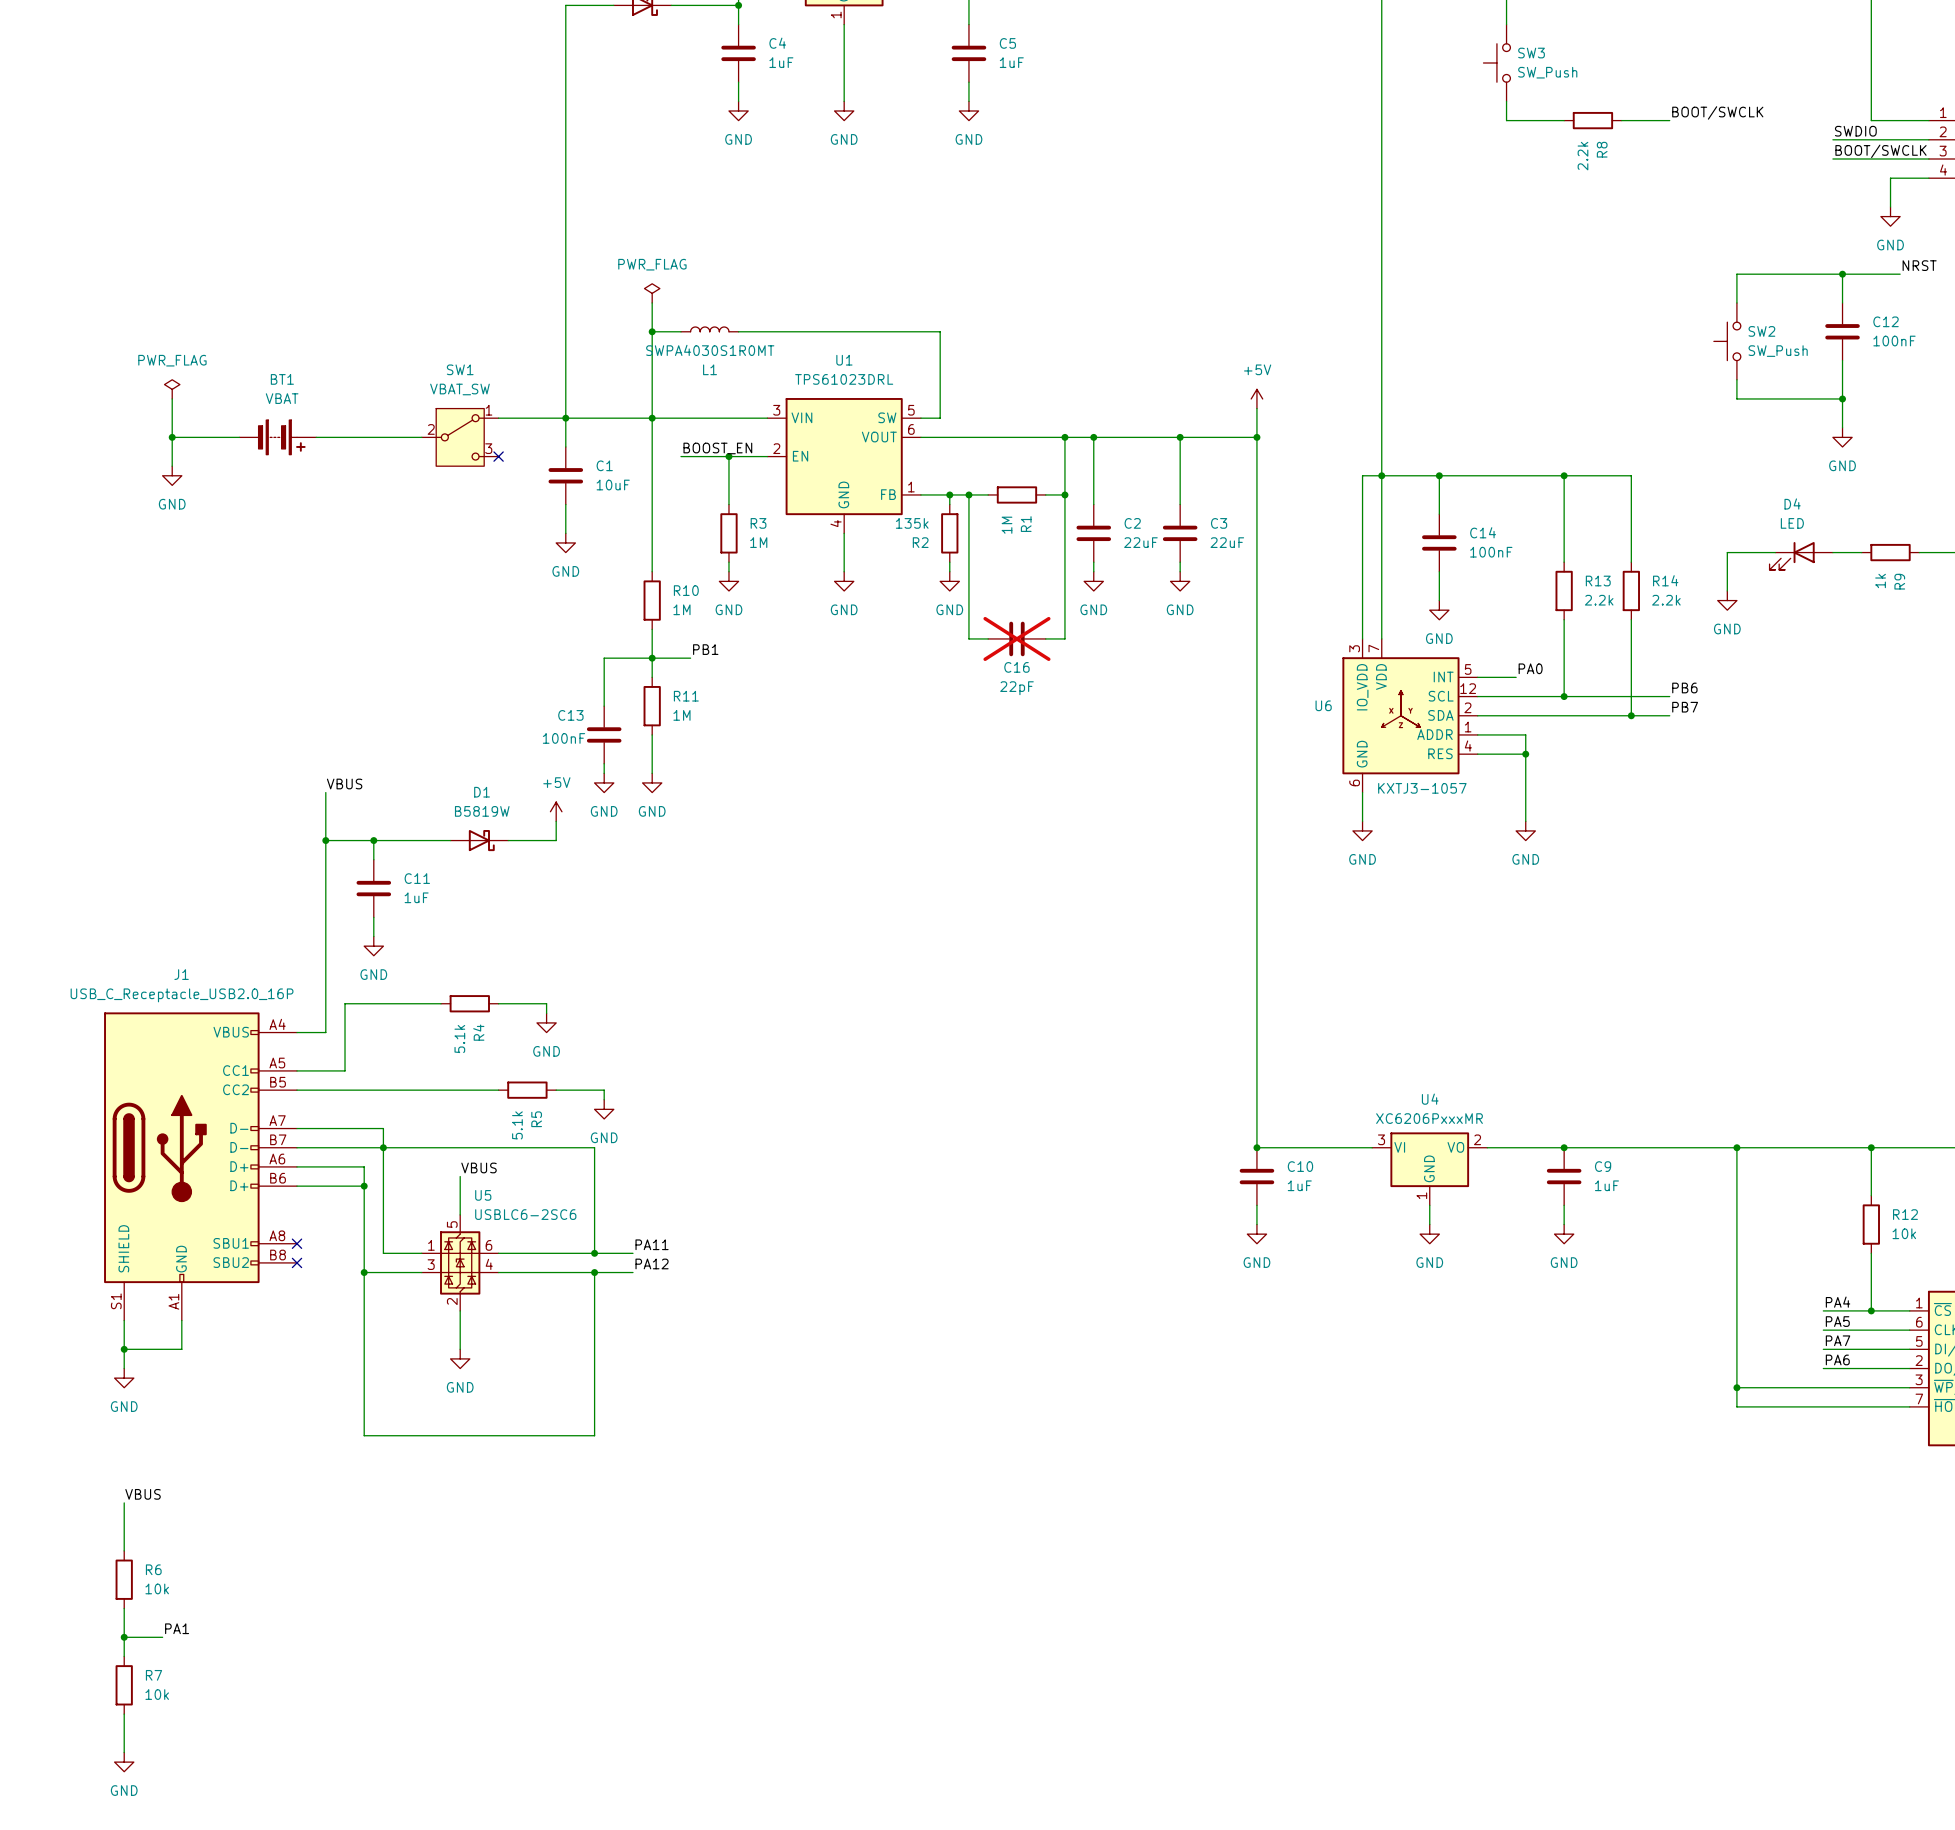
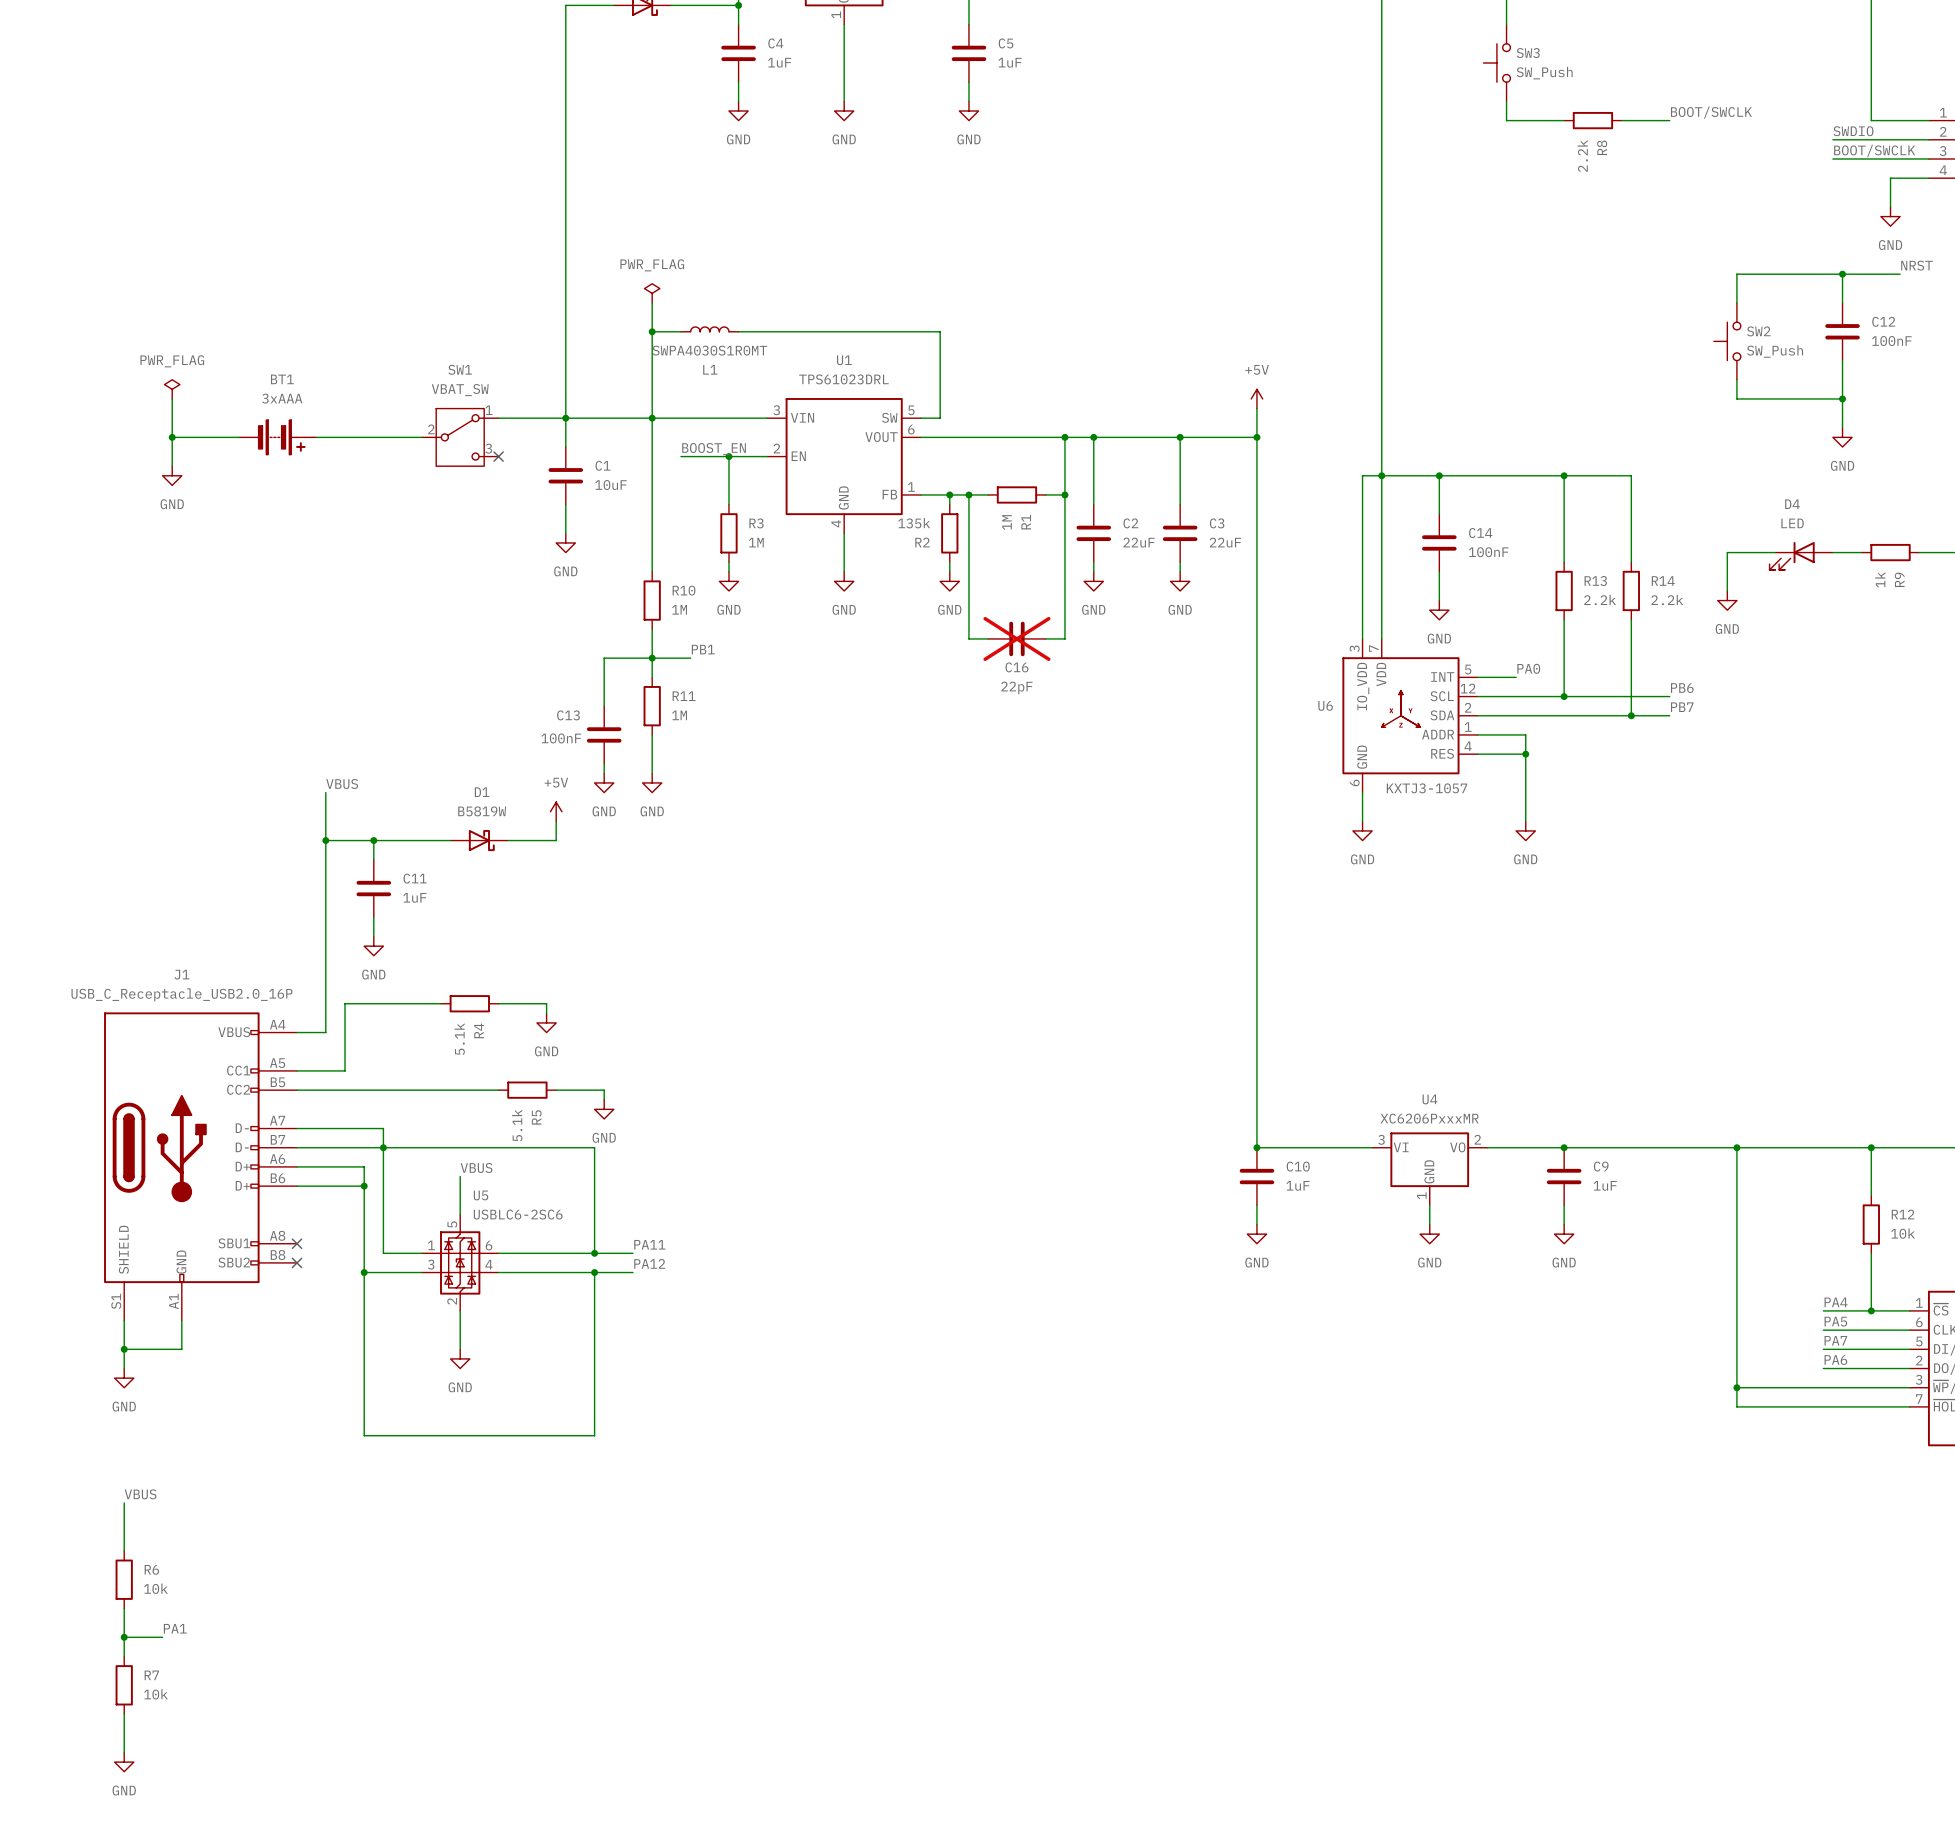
BT1 value: VBAT (282, 398) -> 3xAAA (282, 398)

